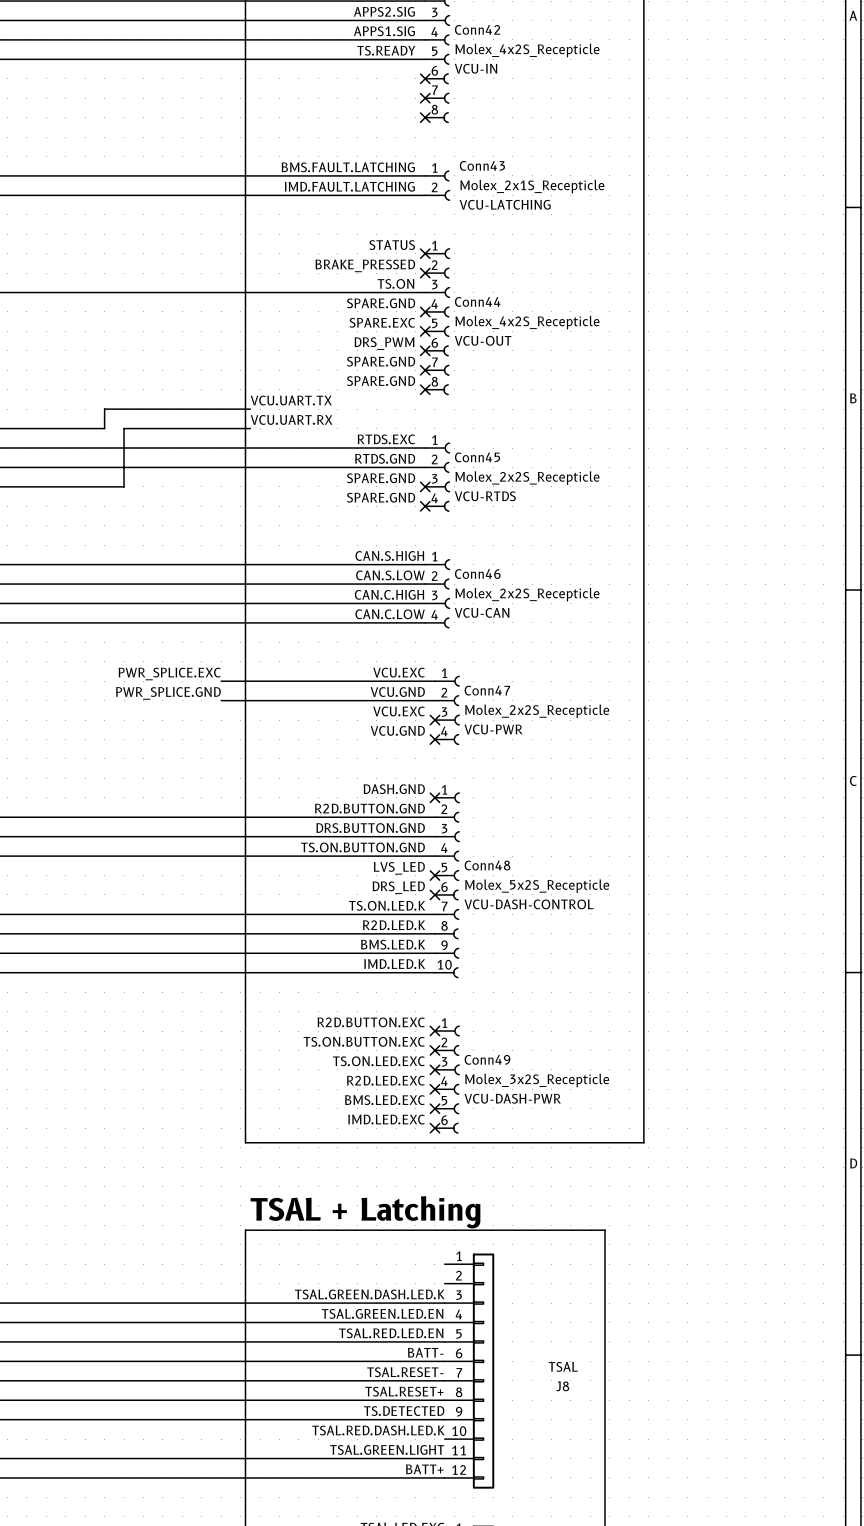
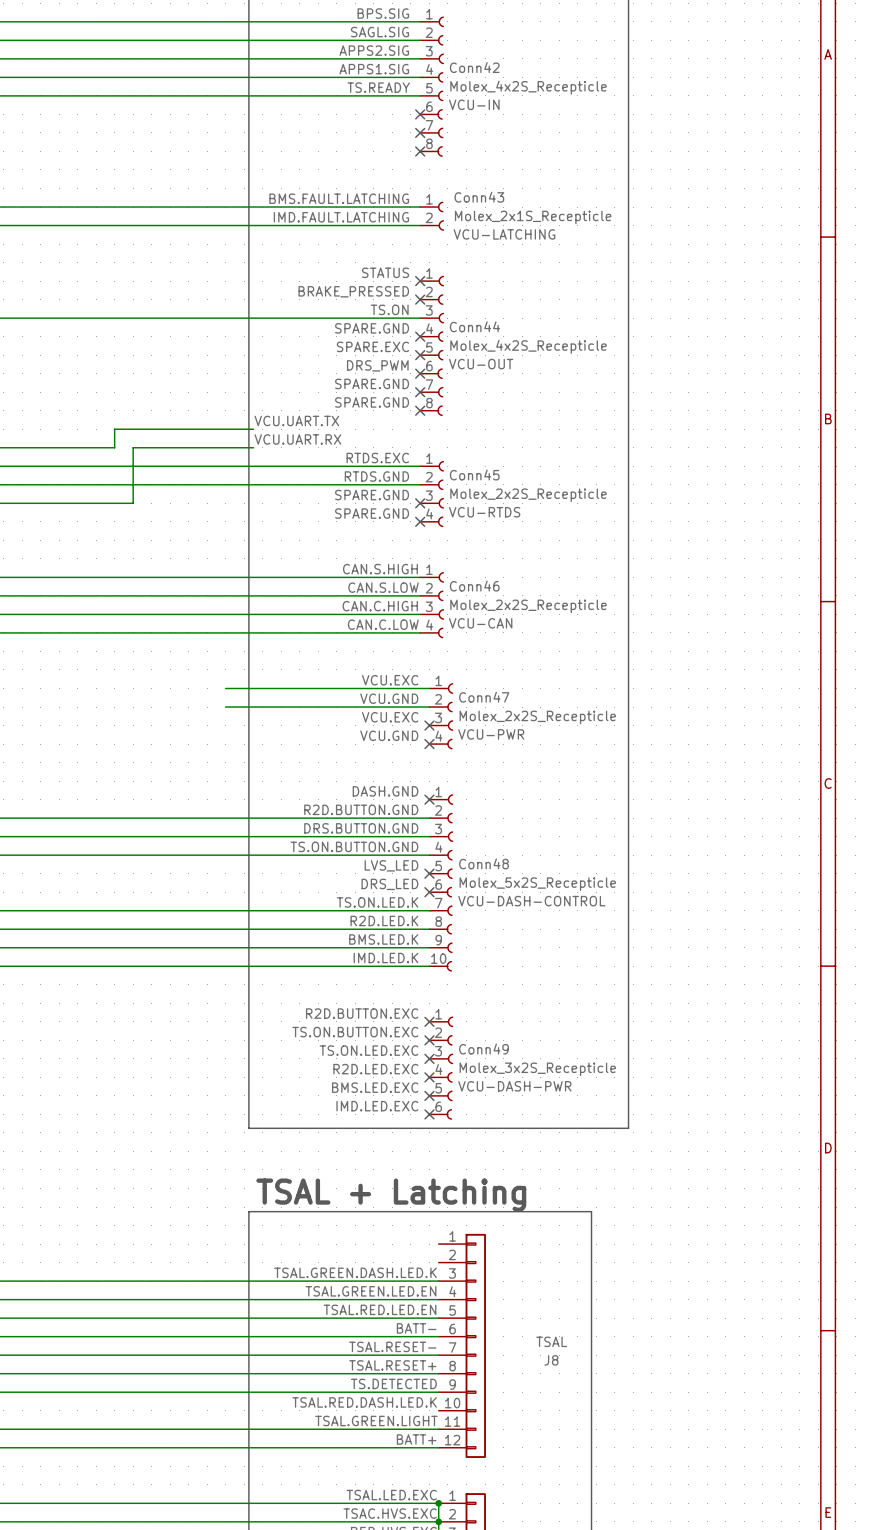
label: PWR_SPLICE.EXC (169, 673) -> none
label: PWR_SPLICE.GND (168, 693) -> none

